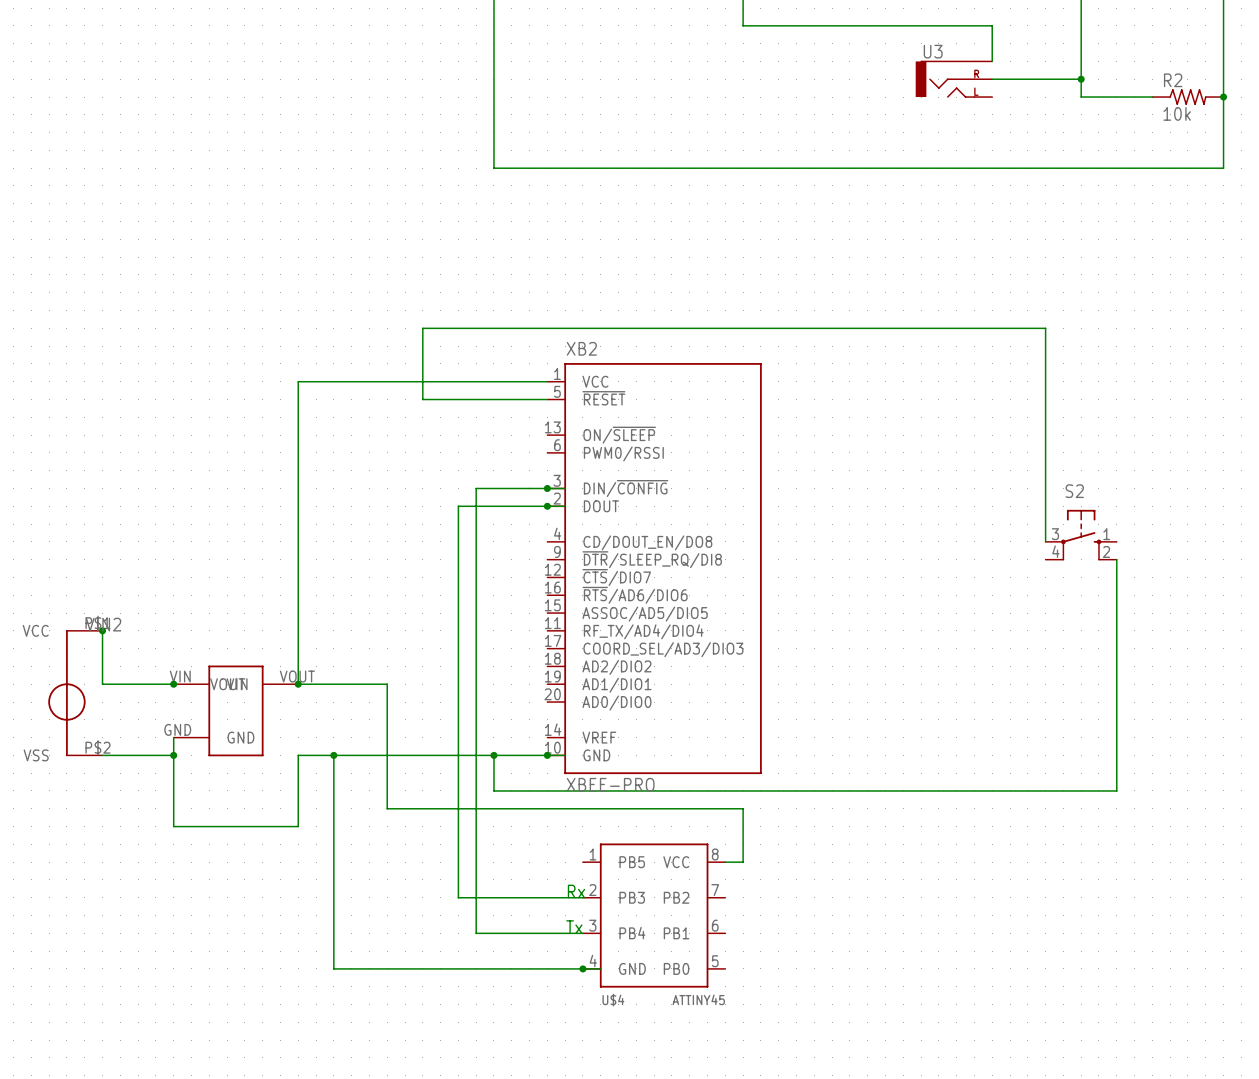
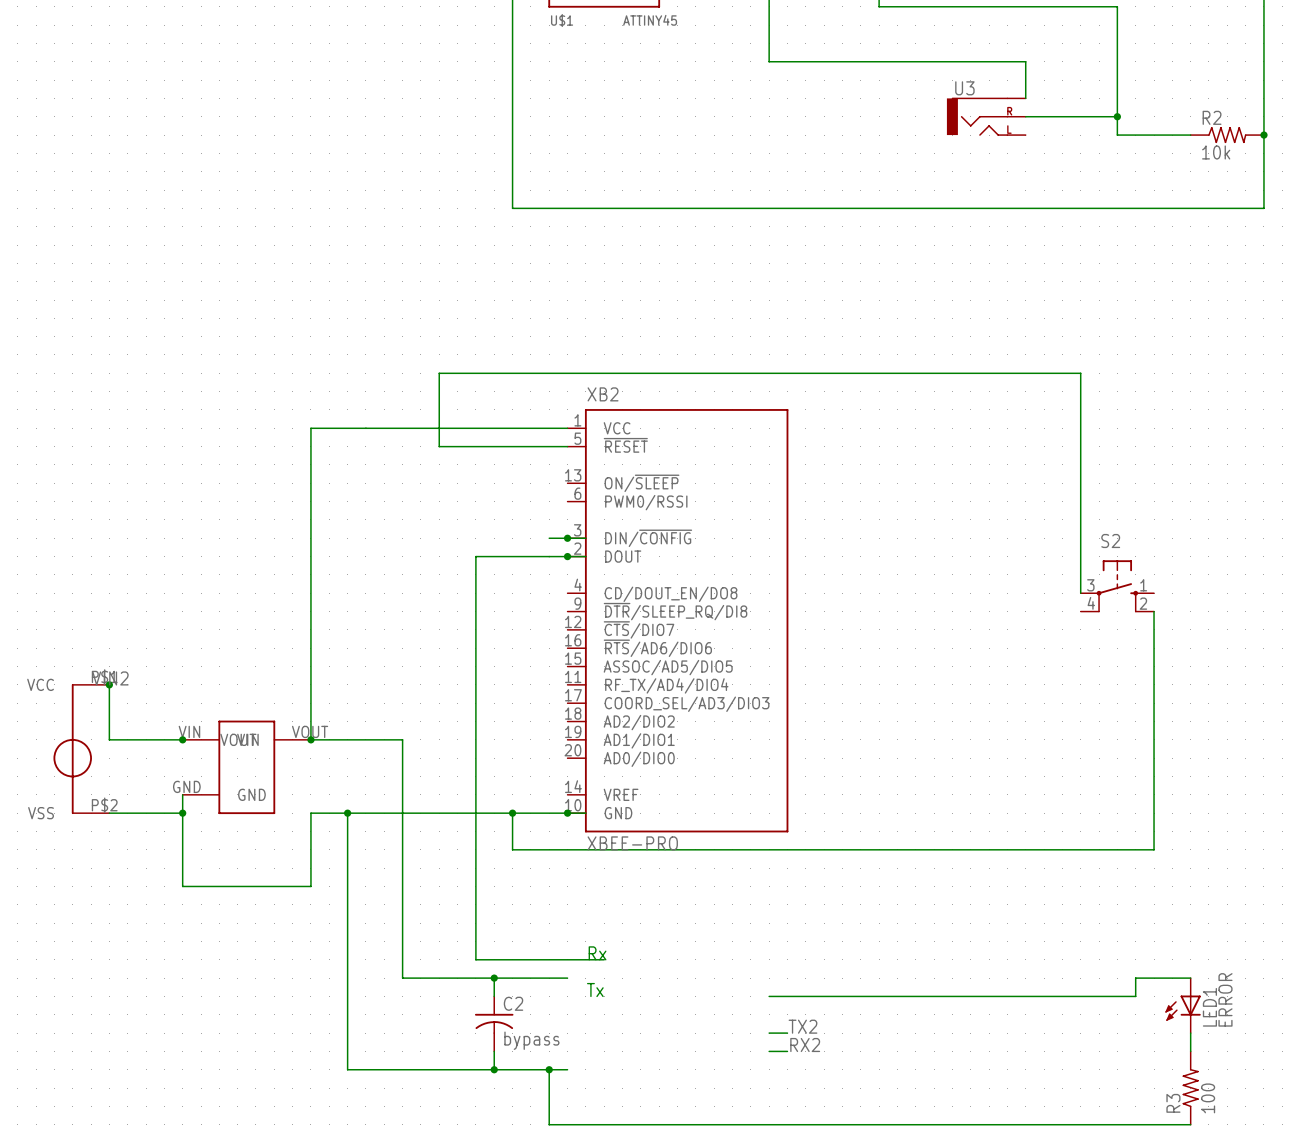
wire: (529, 488) (476, 488) (476, 915) -> none
wire: (387, 808) (743, 808) (743, 862) (725, 862) -> (402, 868) (402, 978) (567, 978)
junction: none -> (494, 978)
U$4: ATTINY45 (654, 915) -> none
wire: none -> (1190, 978) (1135, 978) (1135, 996) (769, 996)
wire: (476, 933) (582, 933) -> none
LED1: none -> ERROR (1183, 1005)
C2: none -> bypass (494, 1023)
label: none -> TX2 (802, 1026)
wire: (333, 968) (600, 968) -> (347, 1033) (347, 1069) (567, 1069)
junction: (582, 968) -> none
wire: none -> (769, 1033) (787, 1033)
wire: none -> (1190, 1033) (1190, 1051)
label: none -> RX2 (805, 1045)
wire: none -> (494, 1051) (494, 1069)
wire: none -> (769, 1051) (787, 1051)
junction: none -> (494, 1069)
wire: none -> (549, 1069) (549, 1124) (1190, 1124)
junction: none -> (549, 1069)
R3: none -> 100 (1190, 1088)

